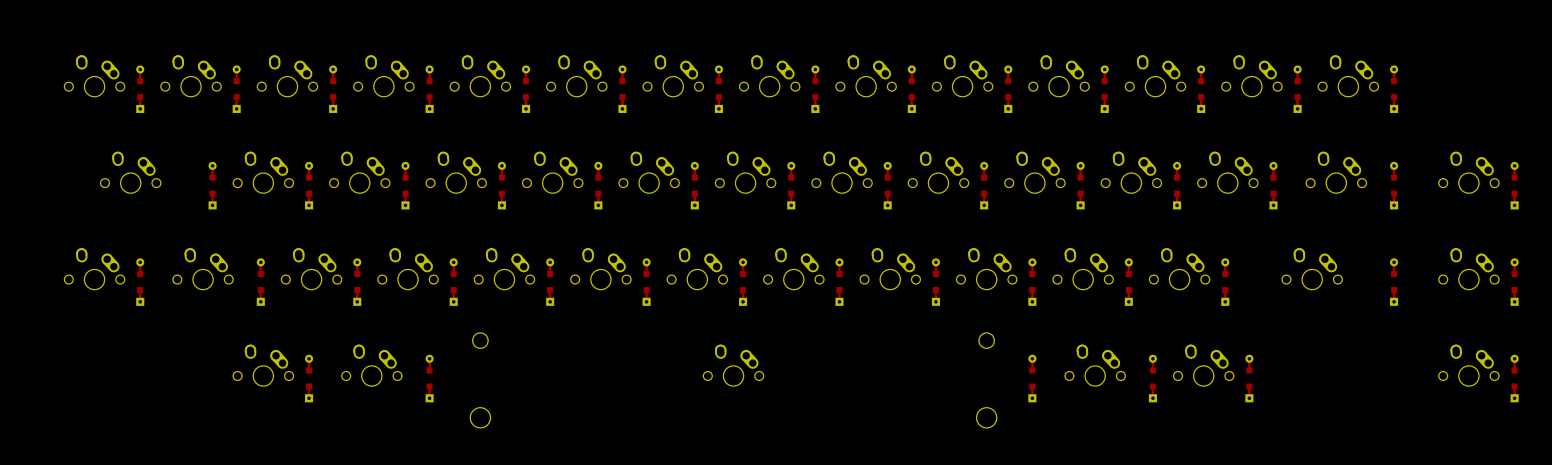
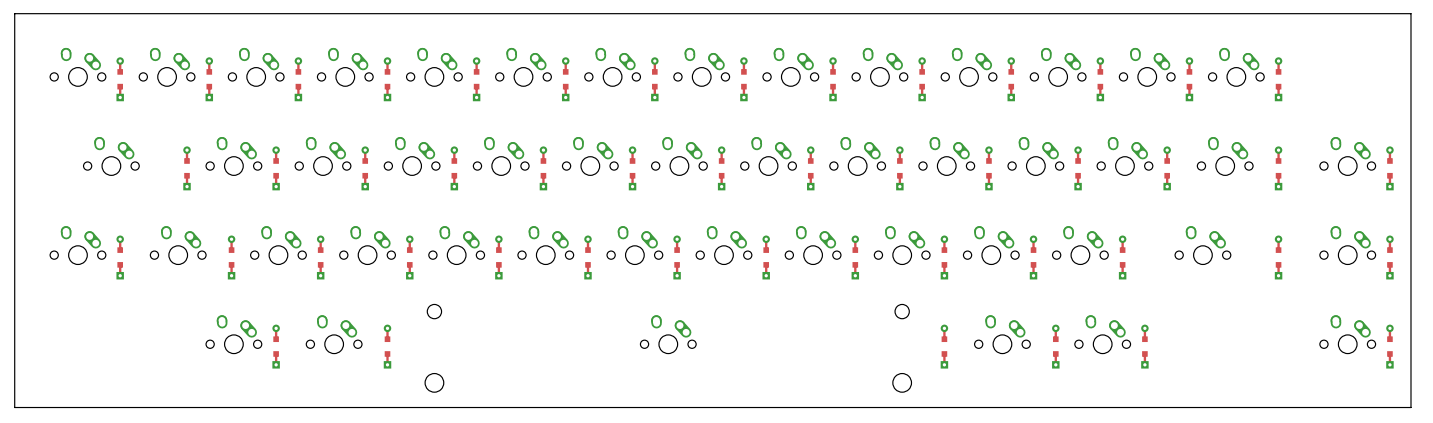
board edge: none -> (1410, 13) (14, 13) (14, 407) (1410, 407) (1410, 13)

